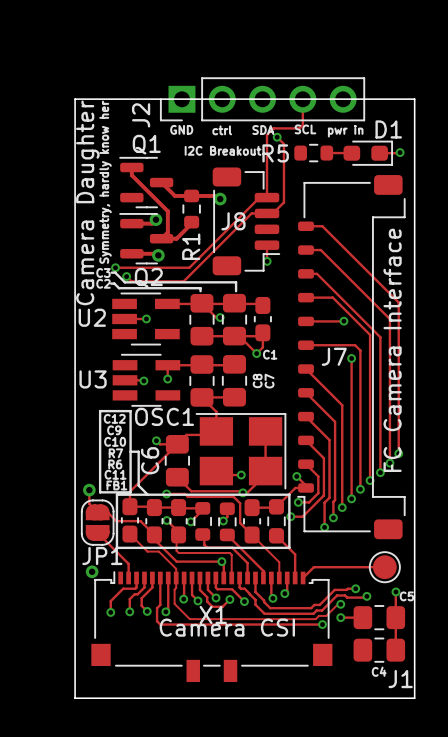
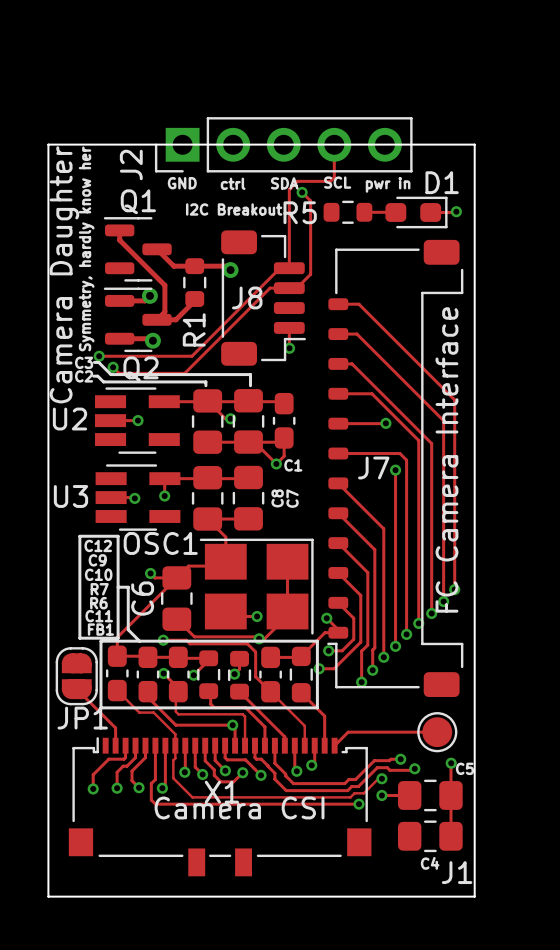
track: (89, 490) (89, 503) (97, 512) (107, 512) (116, 521) (140, 521) (154, 534) -> none
via: (89, 490) -> none
via: (92, 571) -> none

